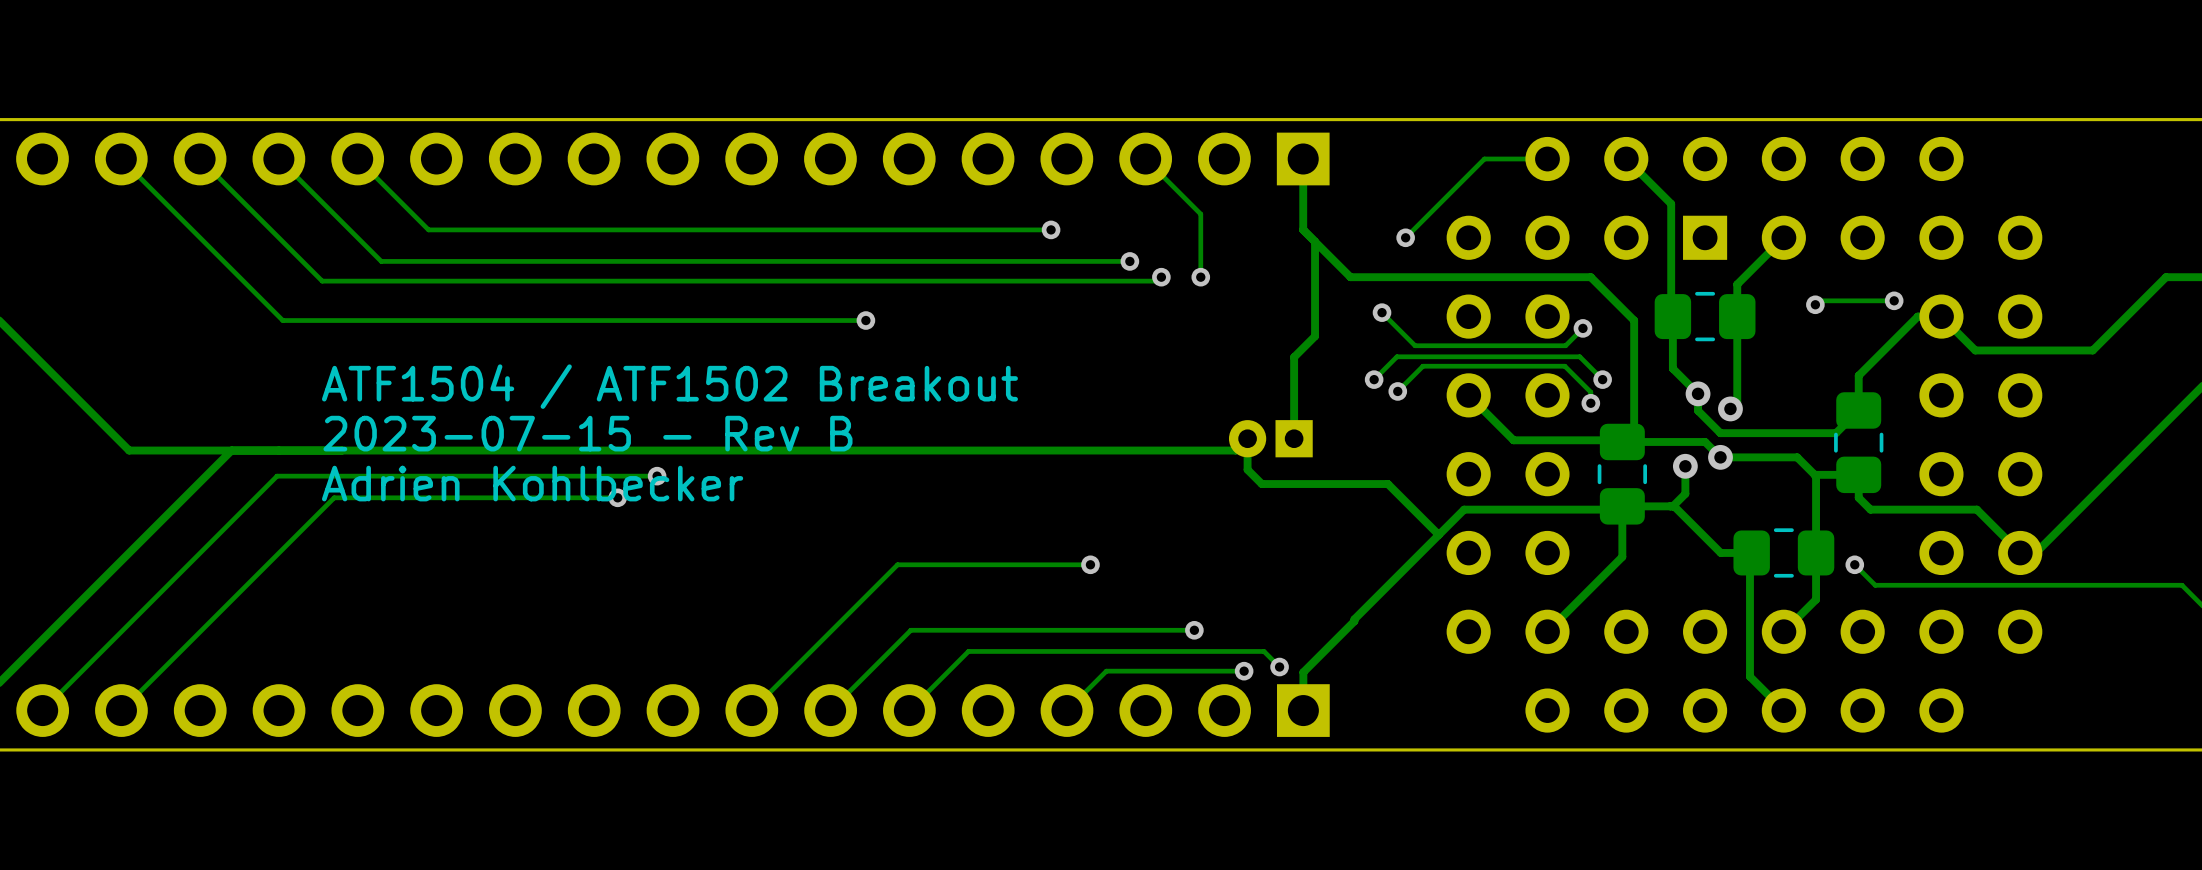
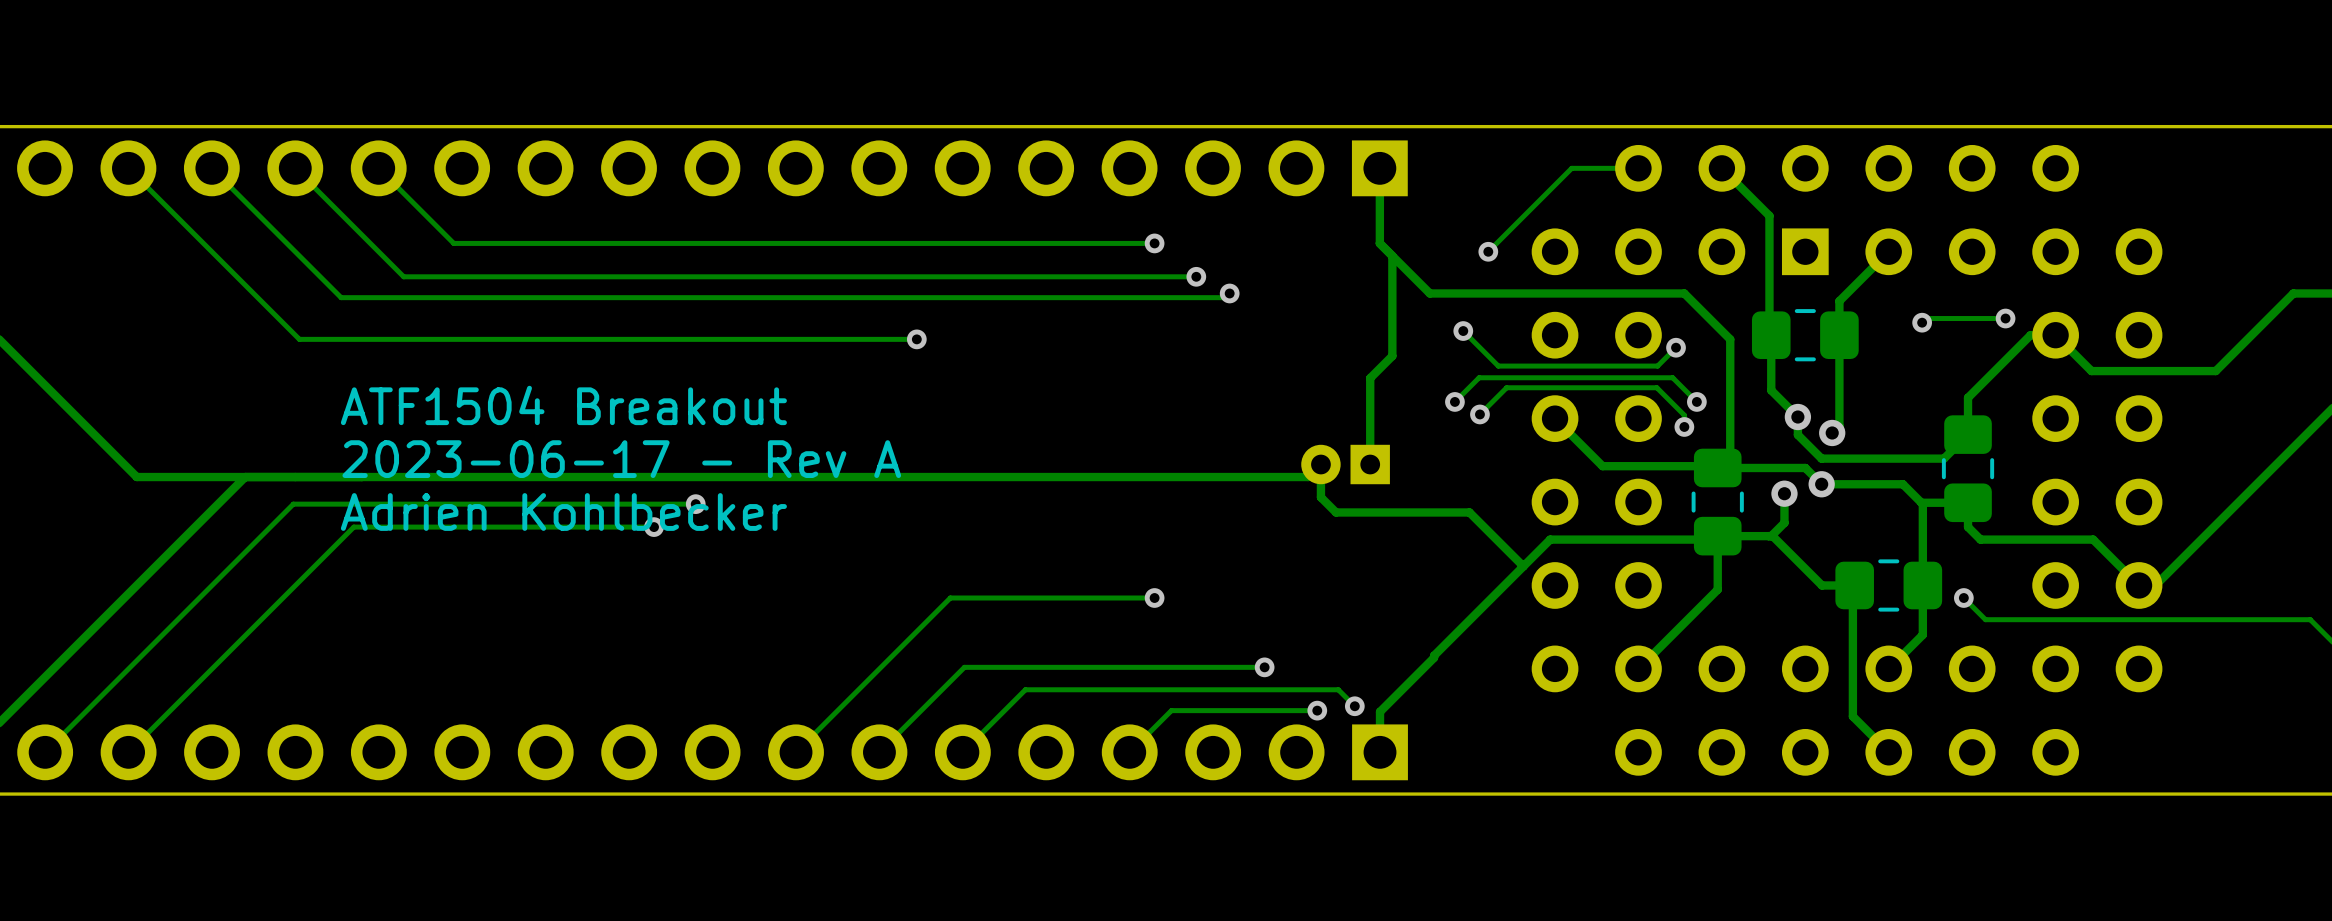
track: (1145, 158) (1200, 214) (1200, 277) -> none
via position: (1051, 229) -> (1154, 243)
track: none -> (1154, 243) (1112, 243)
via: (1200, 277) -> none
text: ATF1504 / ATF1502 Breakout (669, 386) -> ATF1504 Breakout (563, 405)
text: 2023-07-15 - Rev B (587, 433) -> 2023-06-17 - Rev A (621, 459)

